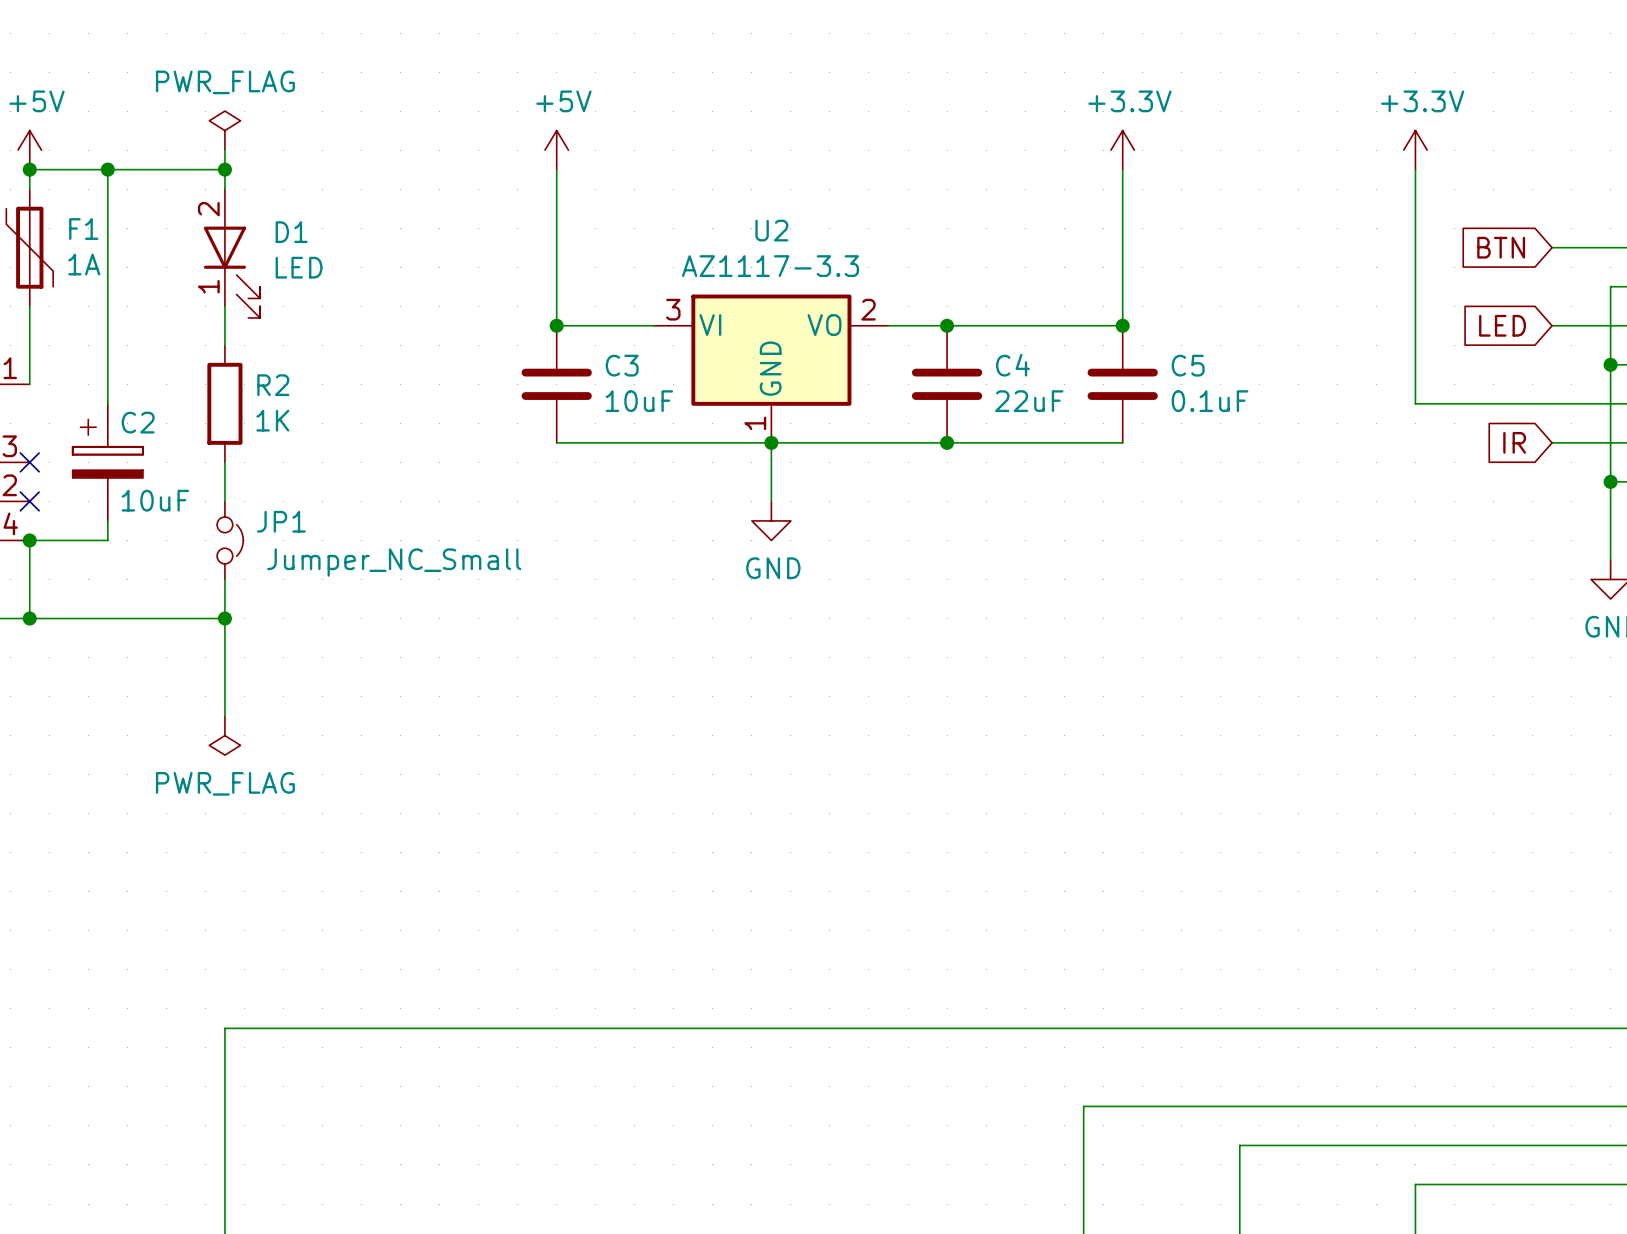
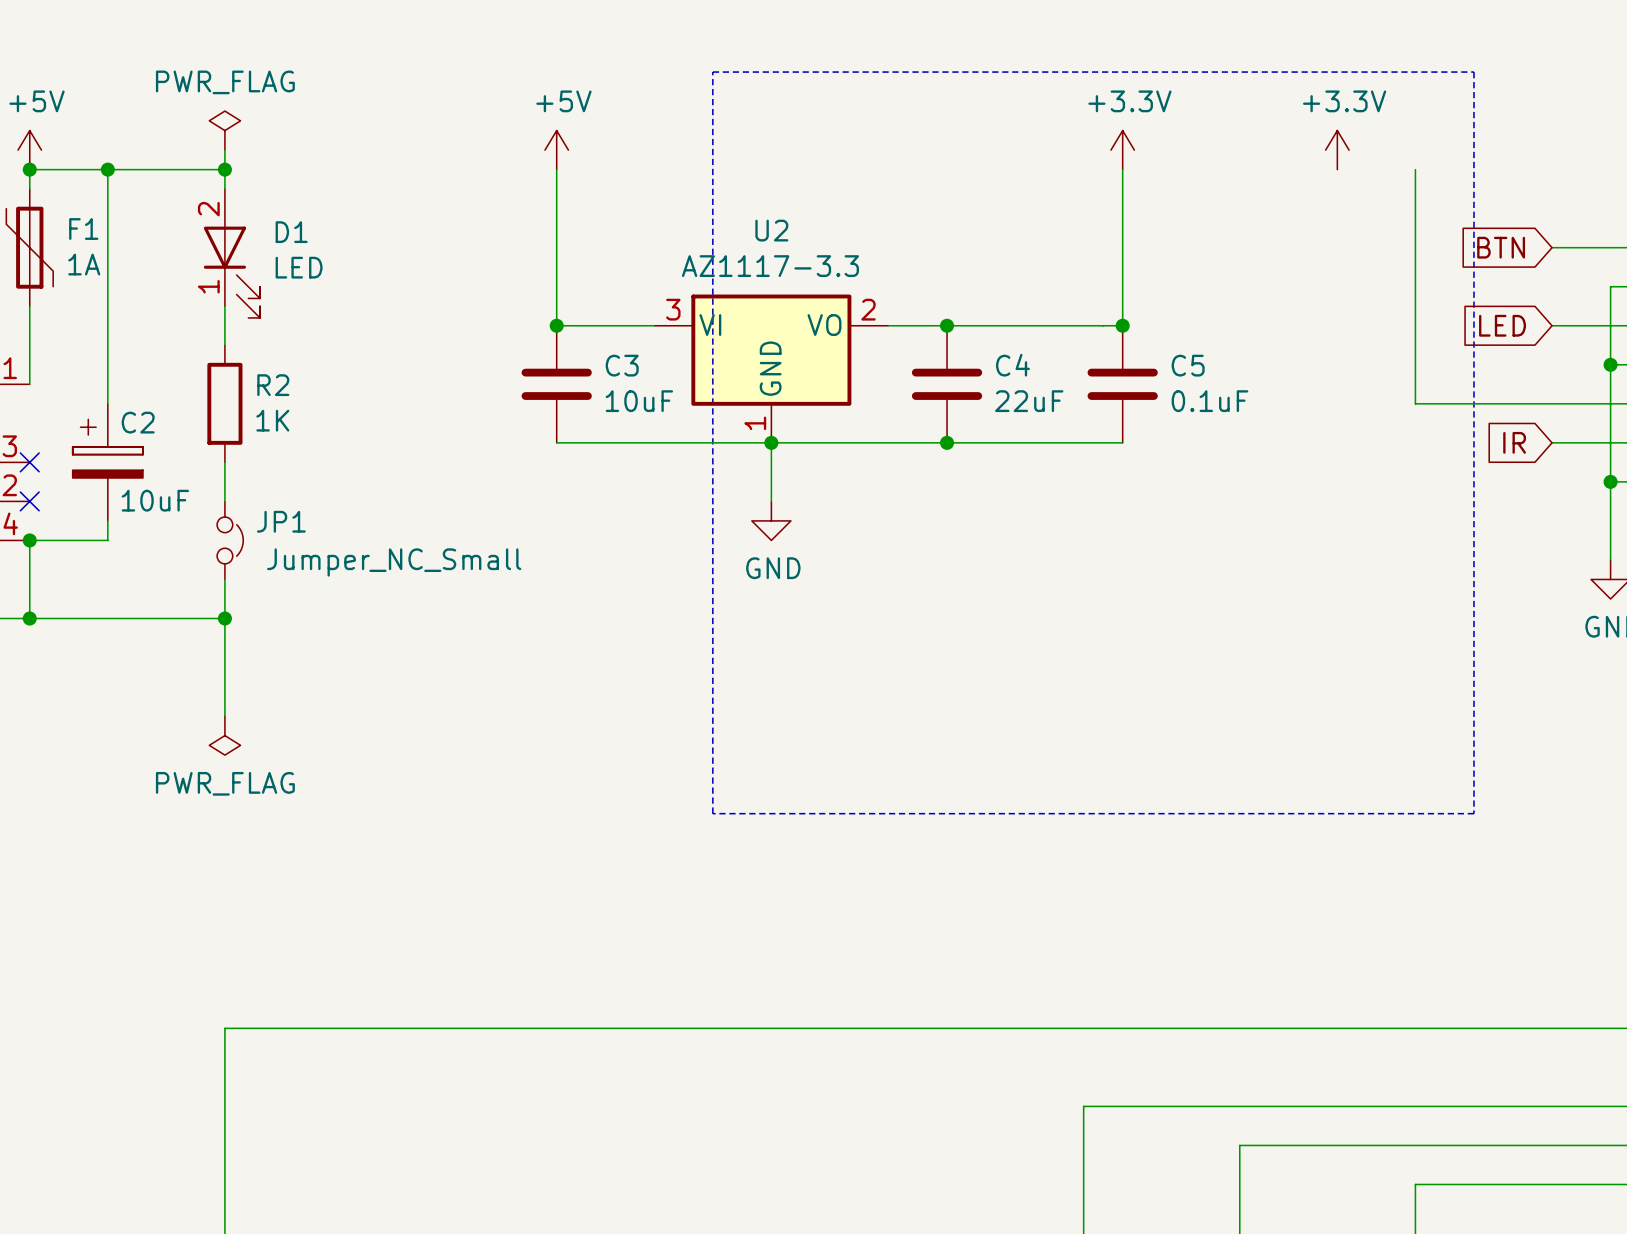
line: none -> (712, 72) (1473, 72) (1473, 813) (712, 813) (712, 72)
power symbol position: +3.3V (1415, 150) -> +3.3V (1337, 150)

